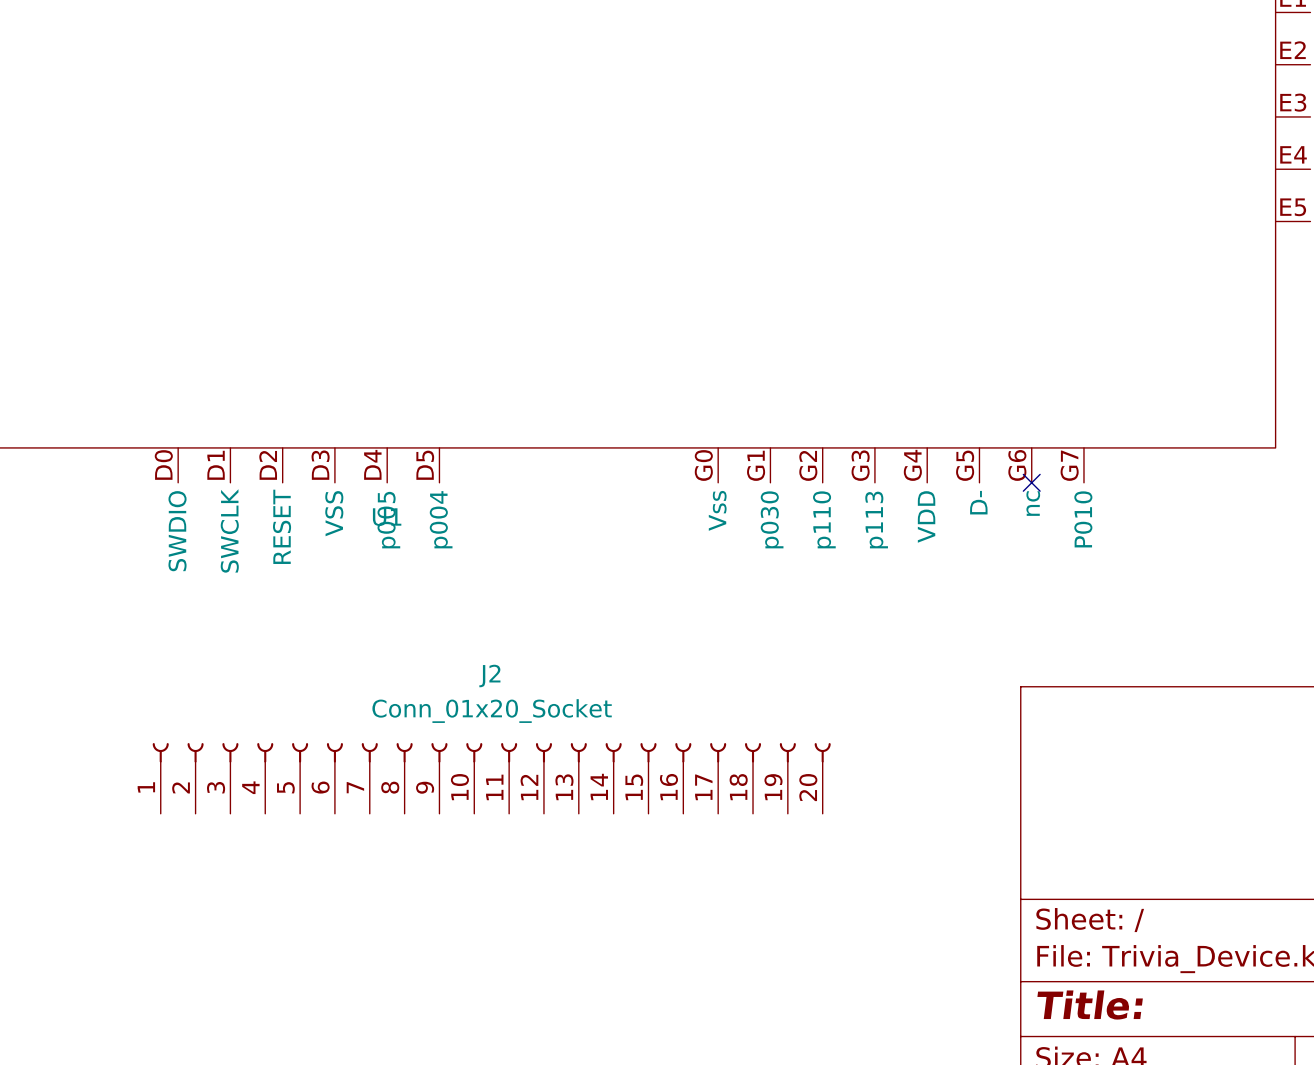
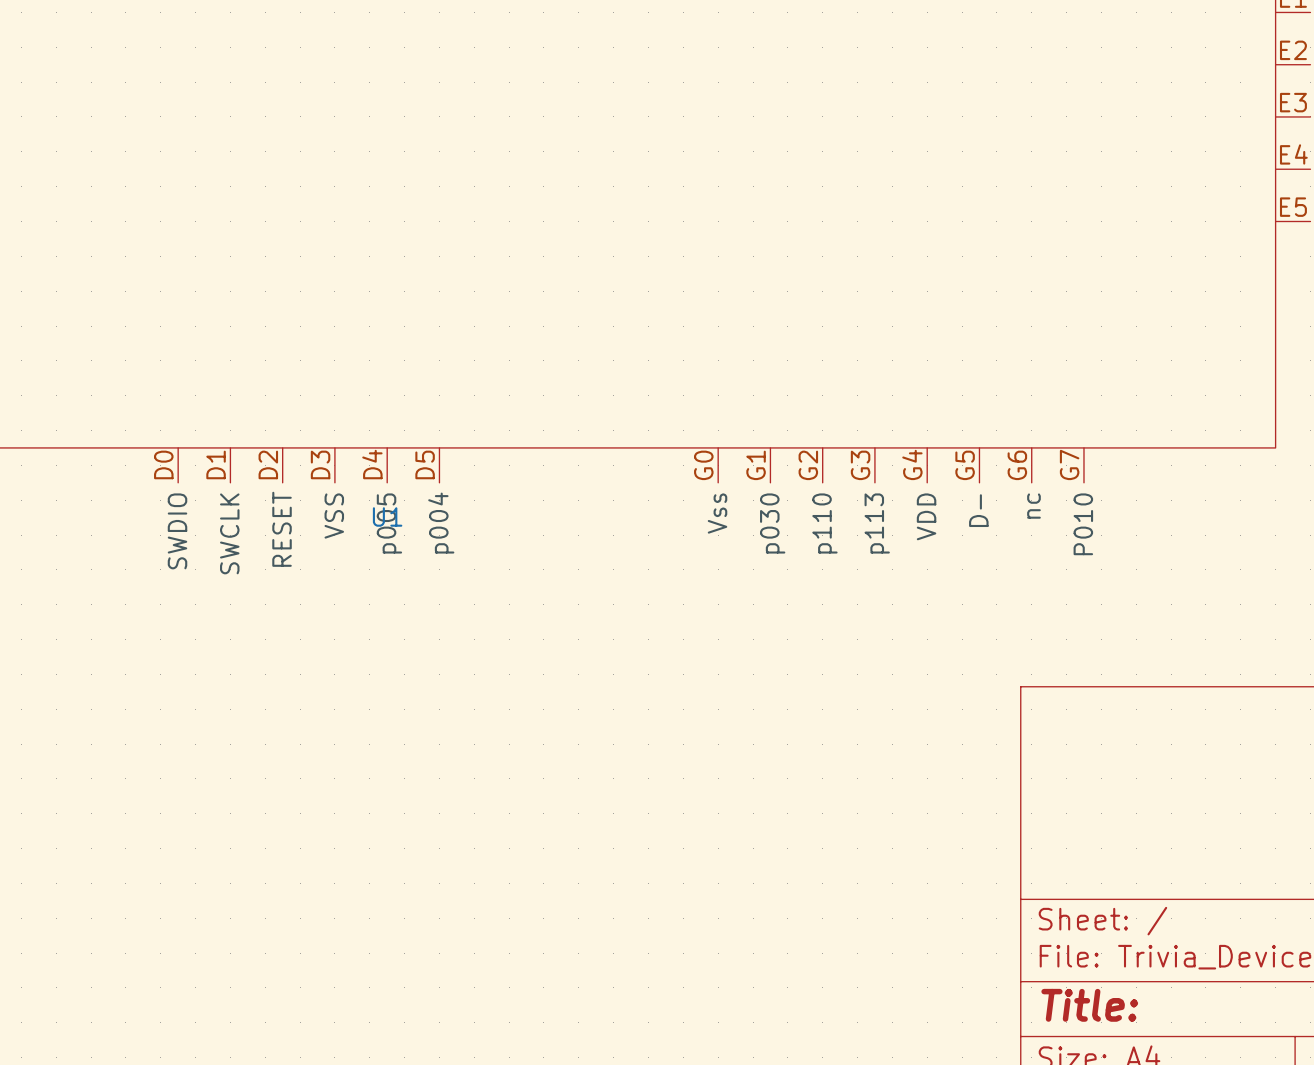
no-connect mark: (1031, 482) -> none
J2: Conn_01x20_Socket (491, 778) -> none

